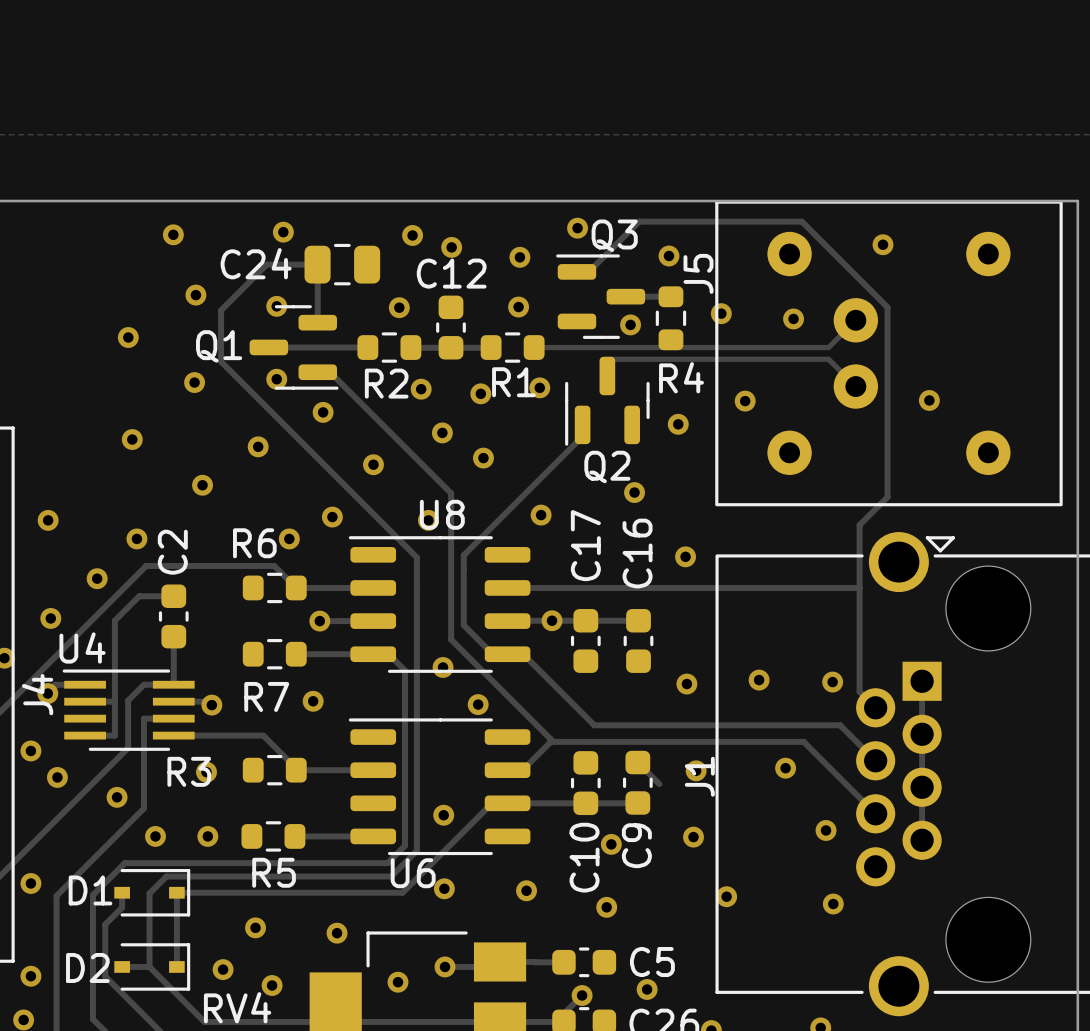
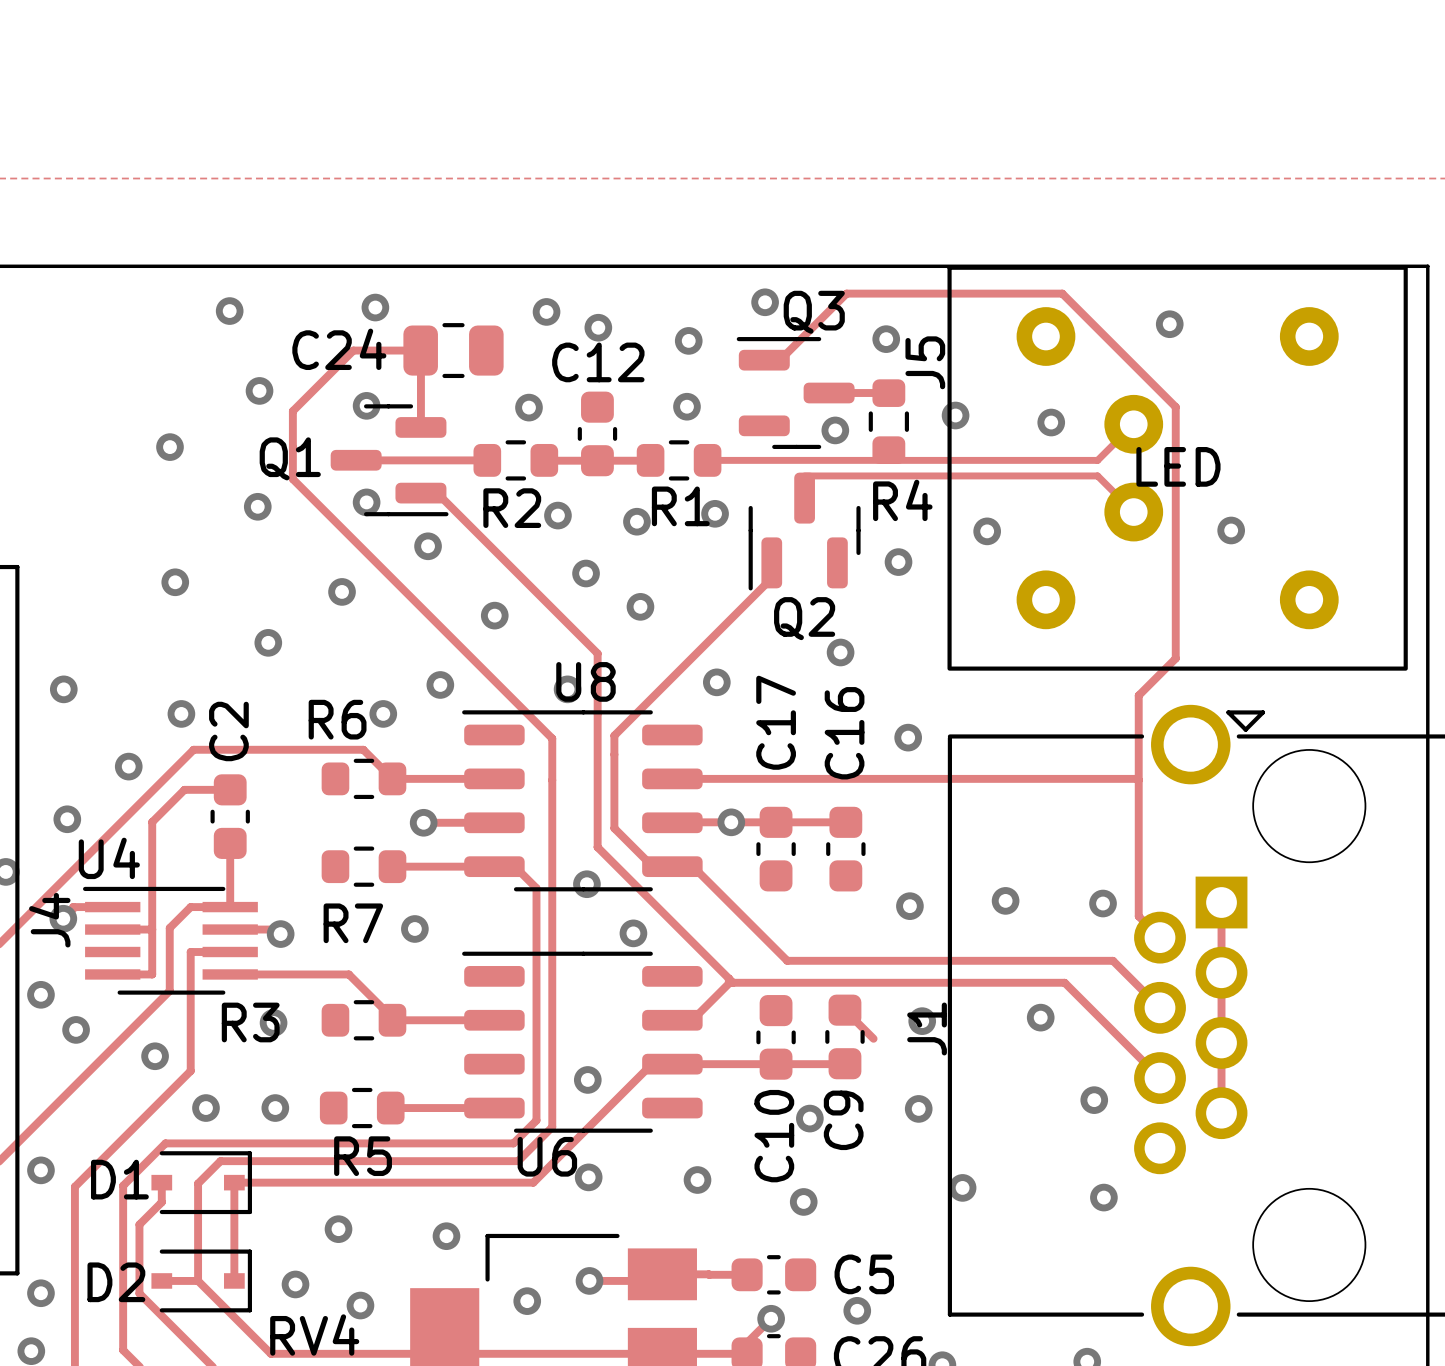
J5 text: none -> LED (1178, 466)

